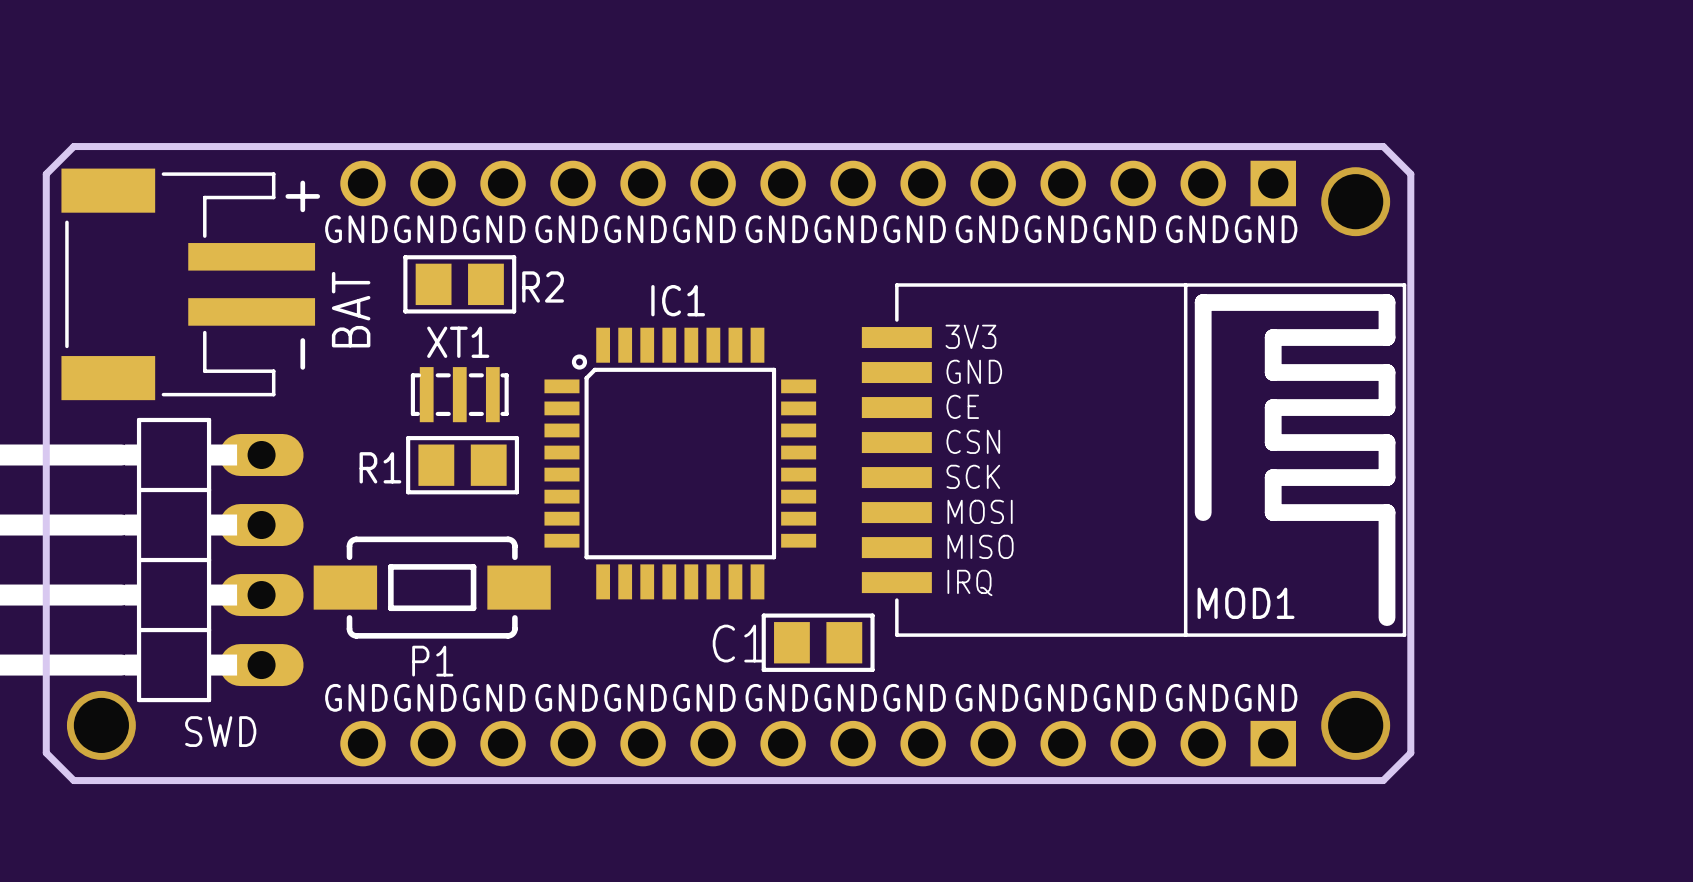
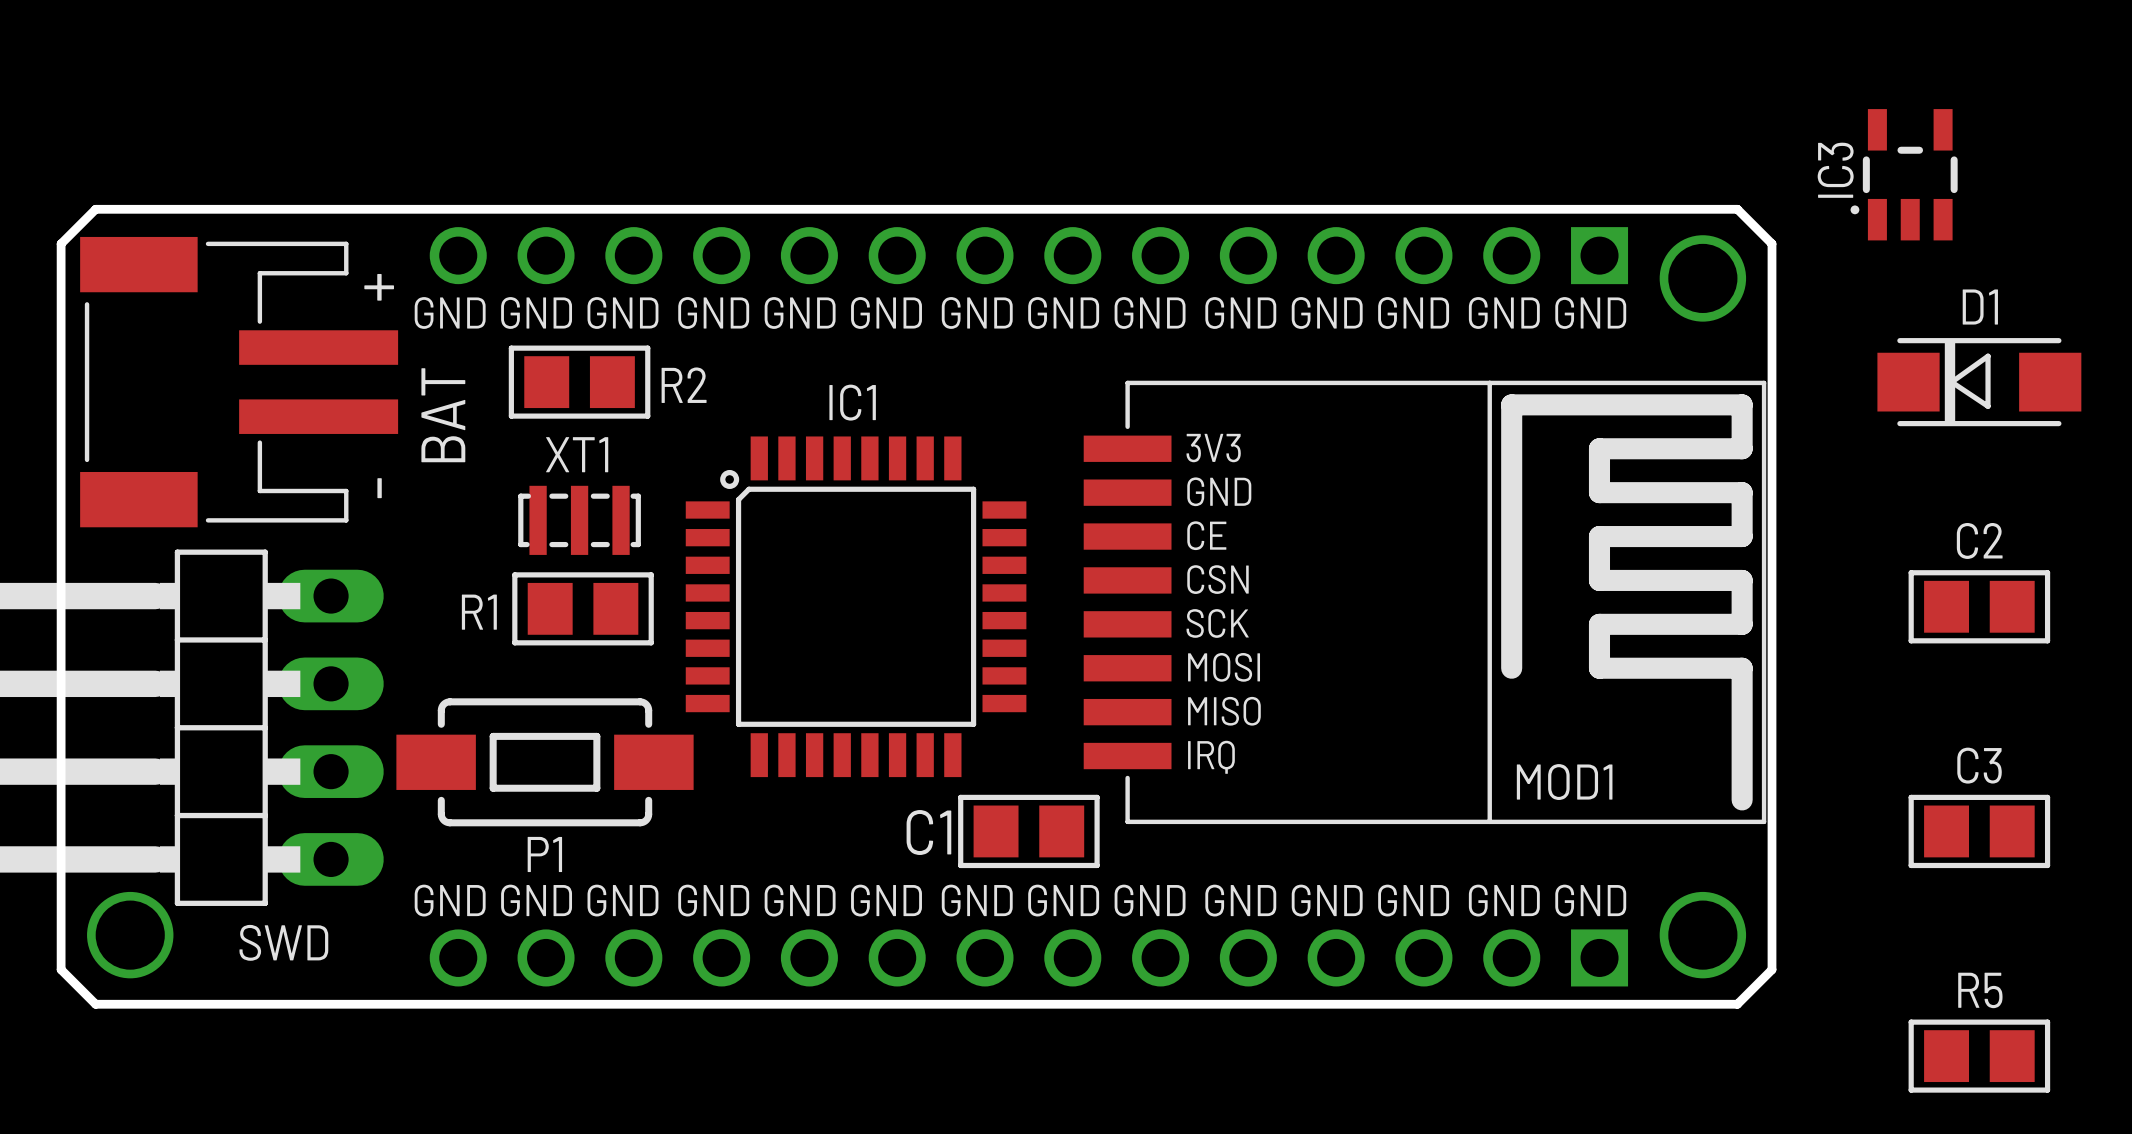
IC3: none -> (1904, 174)
D1: none -> (1979, 382)
C2: none -> (1979, 606)
C3: none -> (1979, 831)
R5: none -> (1979, 1056)

